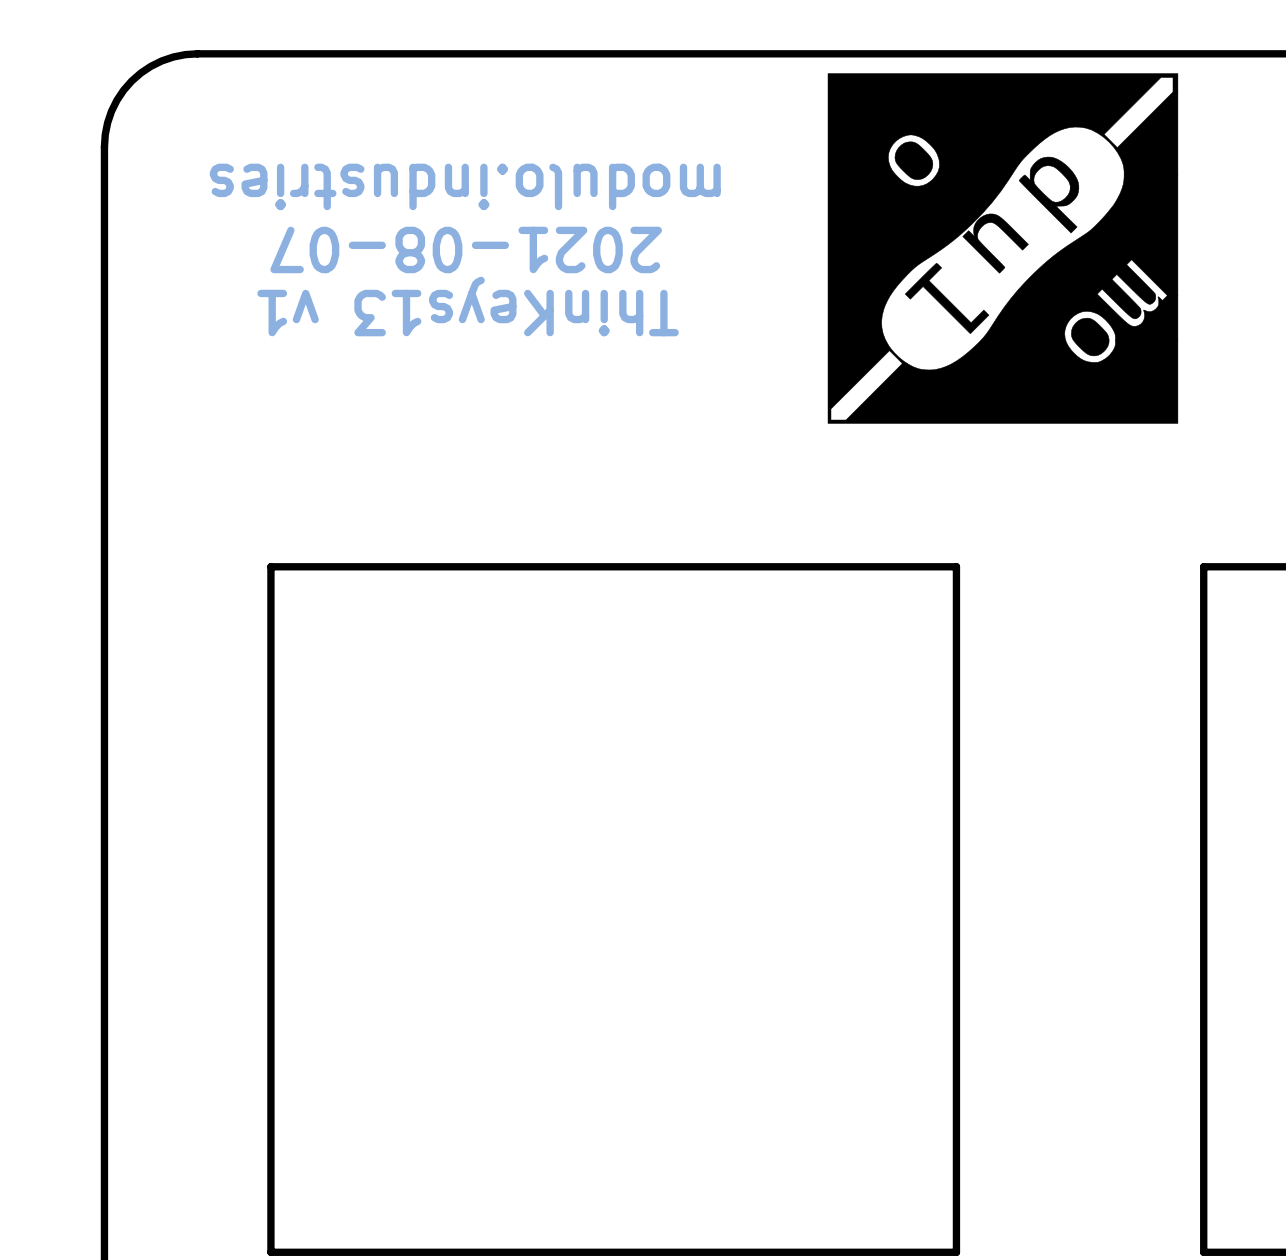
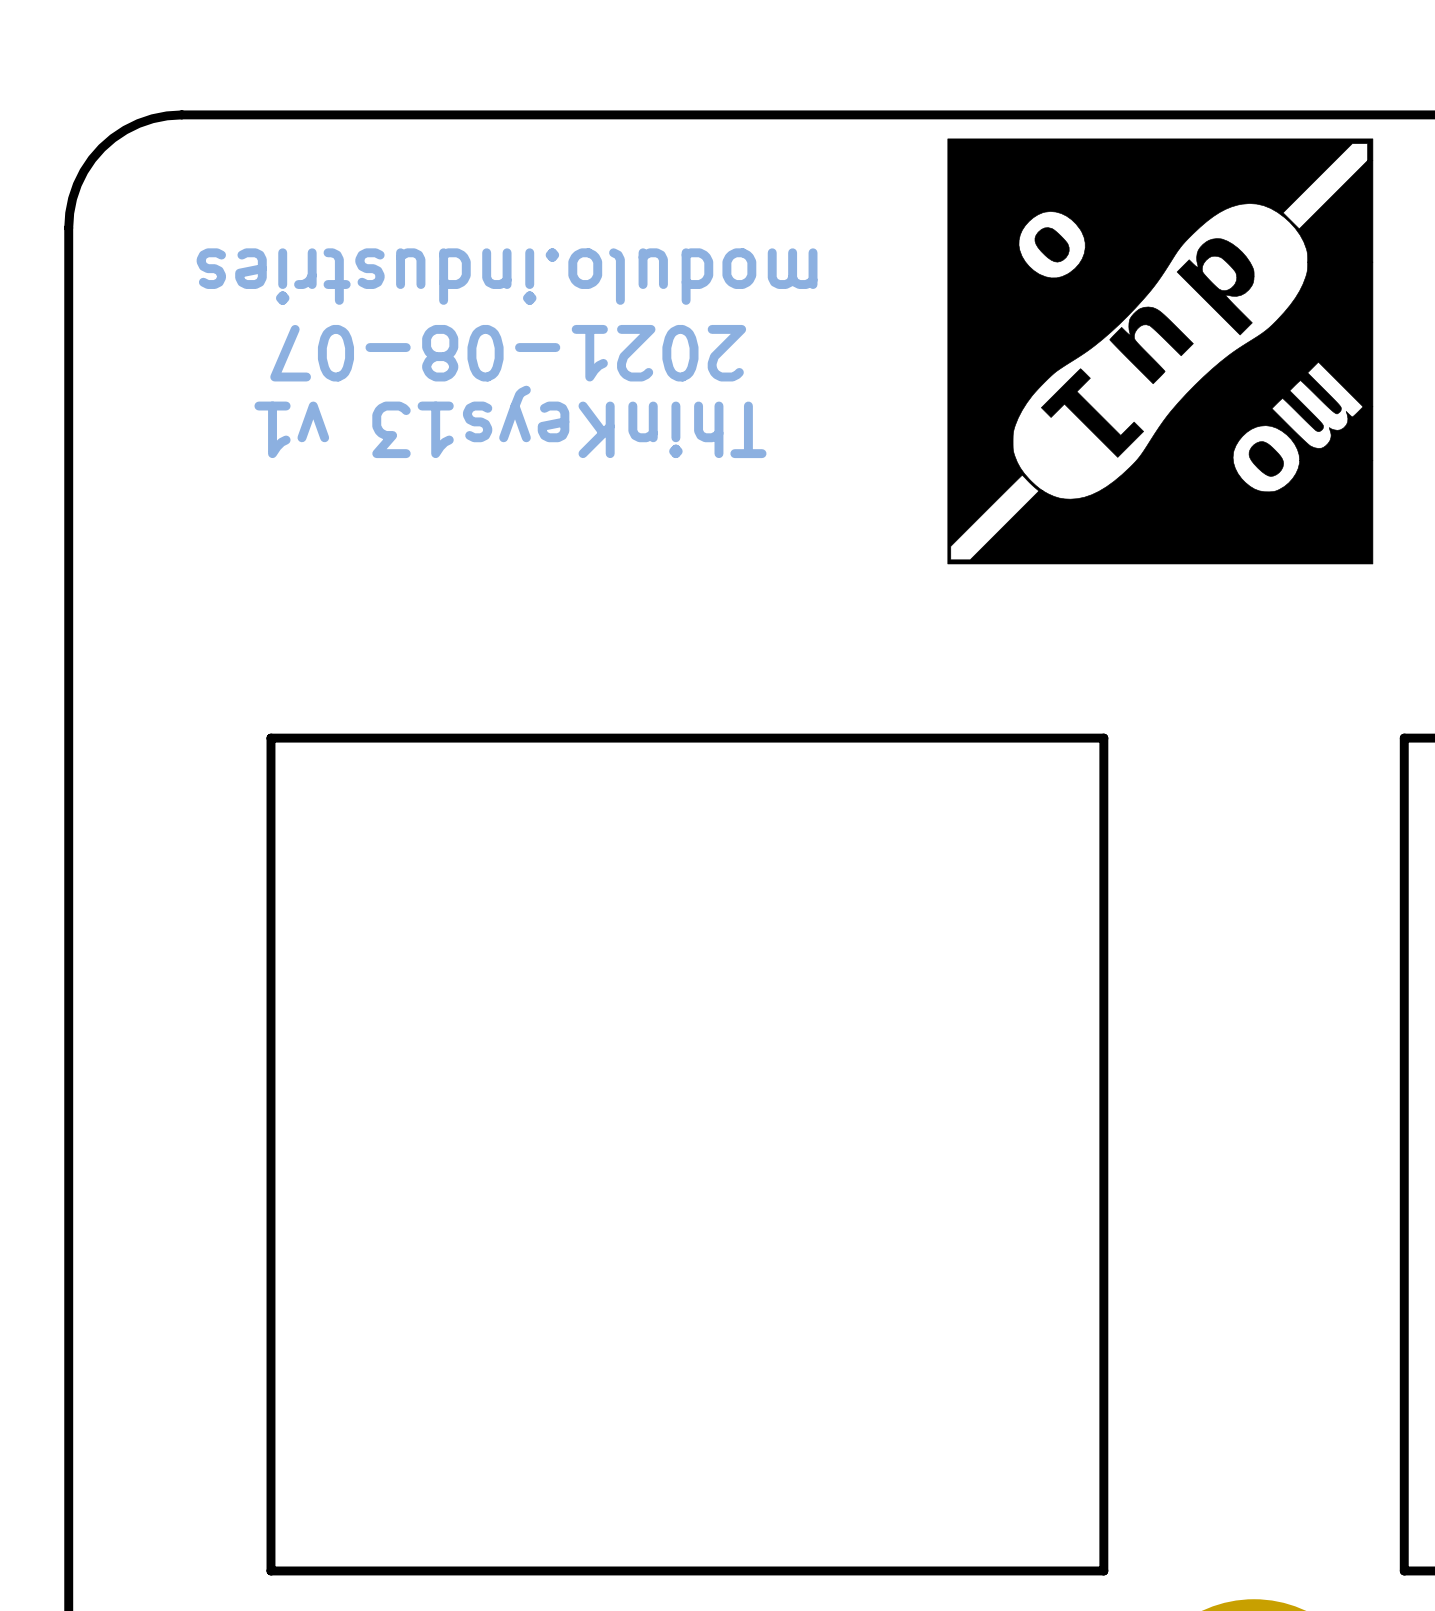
drawing shape: [827, 73, 1179, 424] -> [947, 138, 1374, 565]

